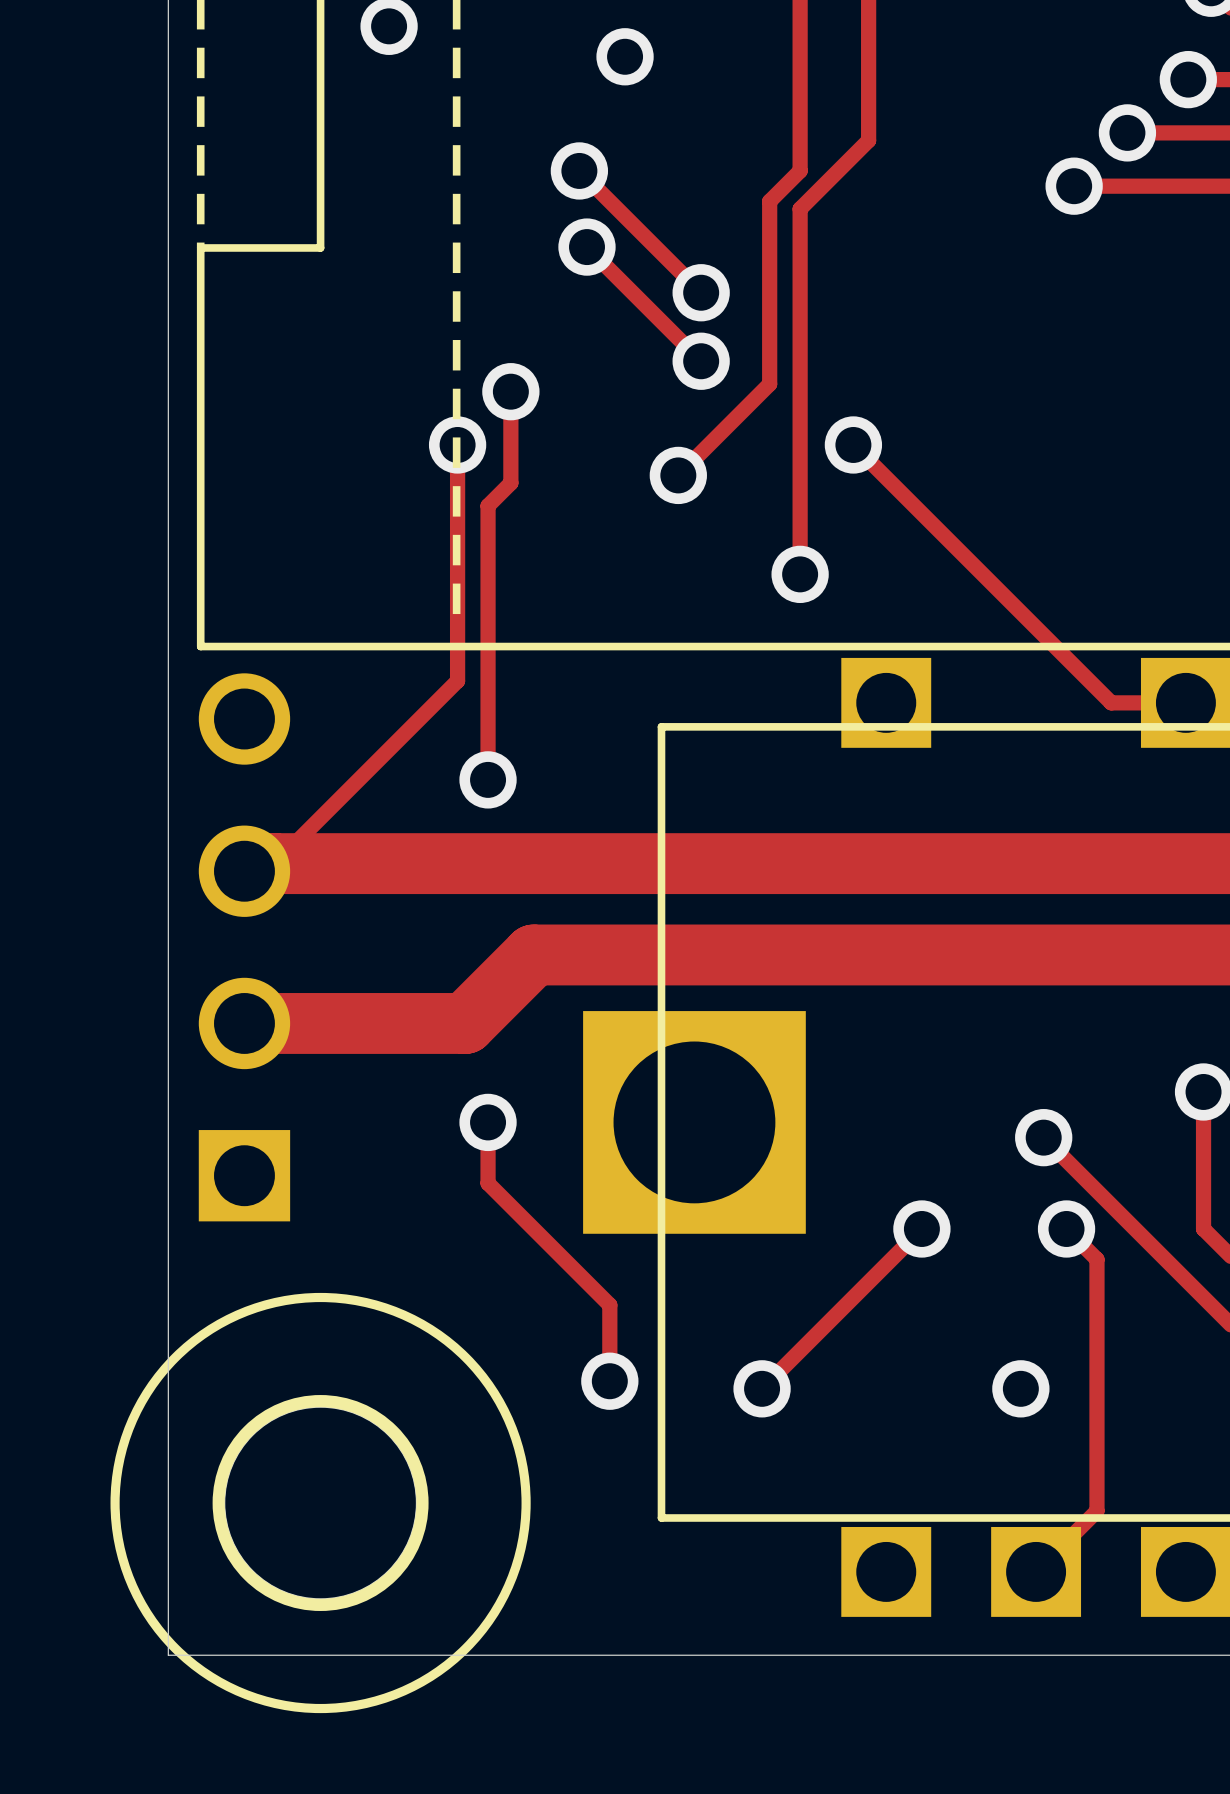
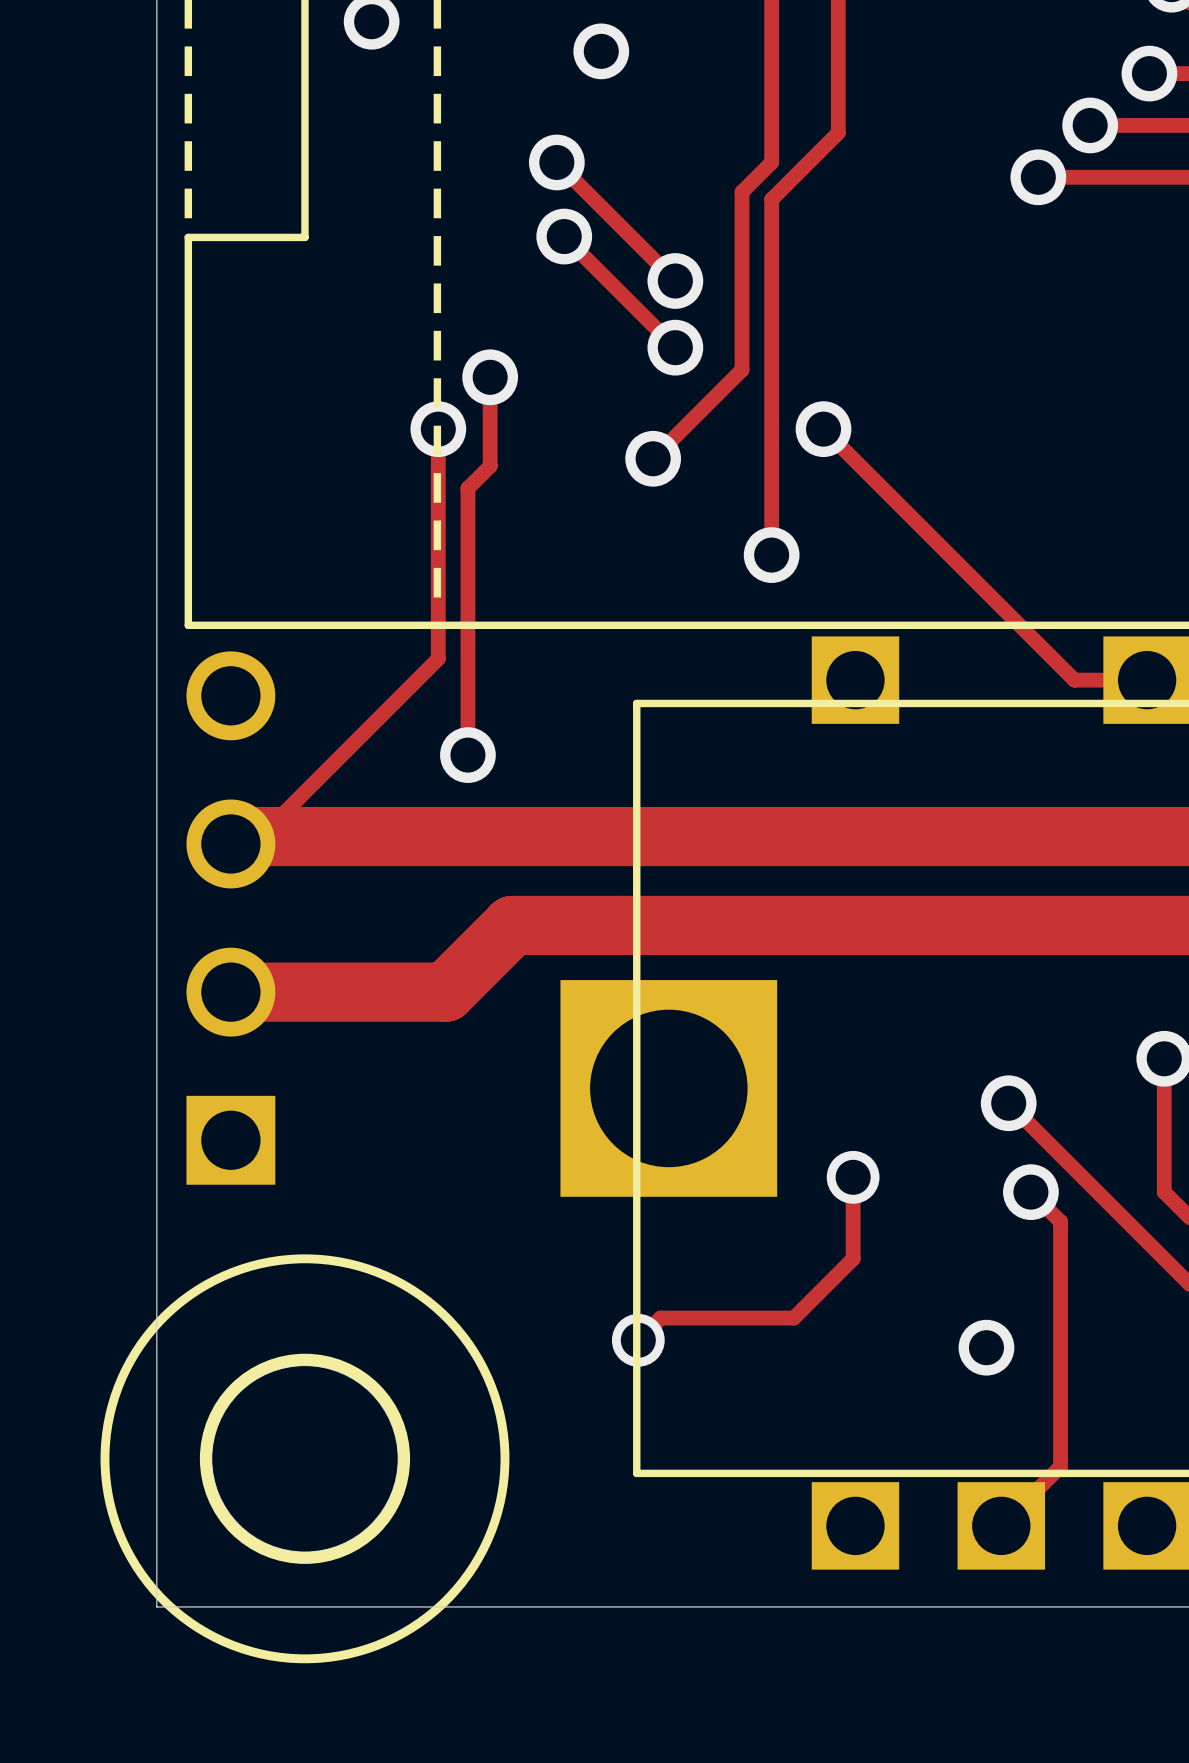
track: (488, 1122) (488, 1183) (609, 1305) (609, 1381) -> none
via: (488, 1122) -> none
track: none -> (853, 1177) (853, 1258) (793, 1318) (660, 1318) (638, 1340)
track: (921, 1228) (762, 1388) -> none
via position: (921, 1228) -> (853, 1177)
via position: (609, 1381) -> (638, 1340)
via: (762, 1388) -> none

